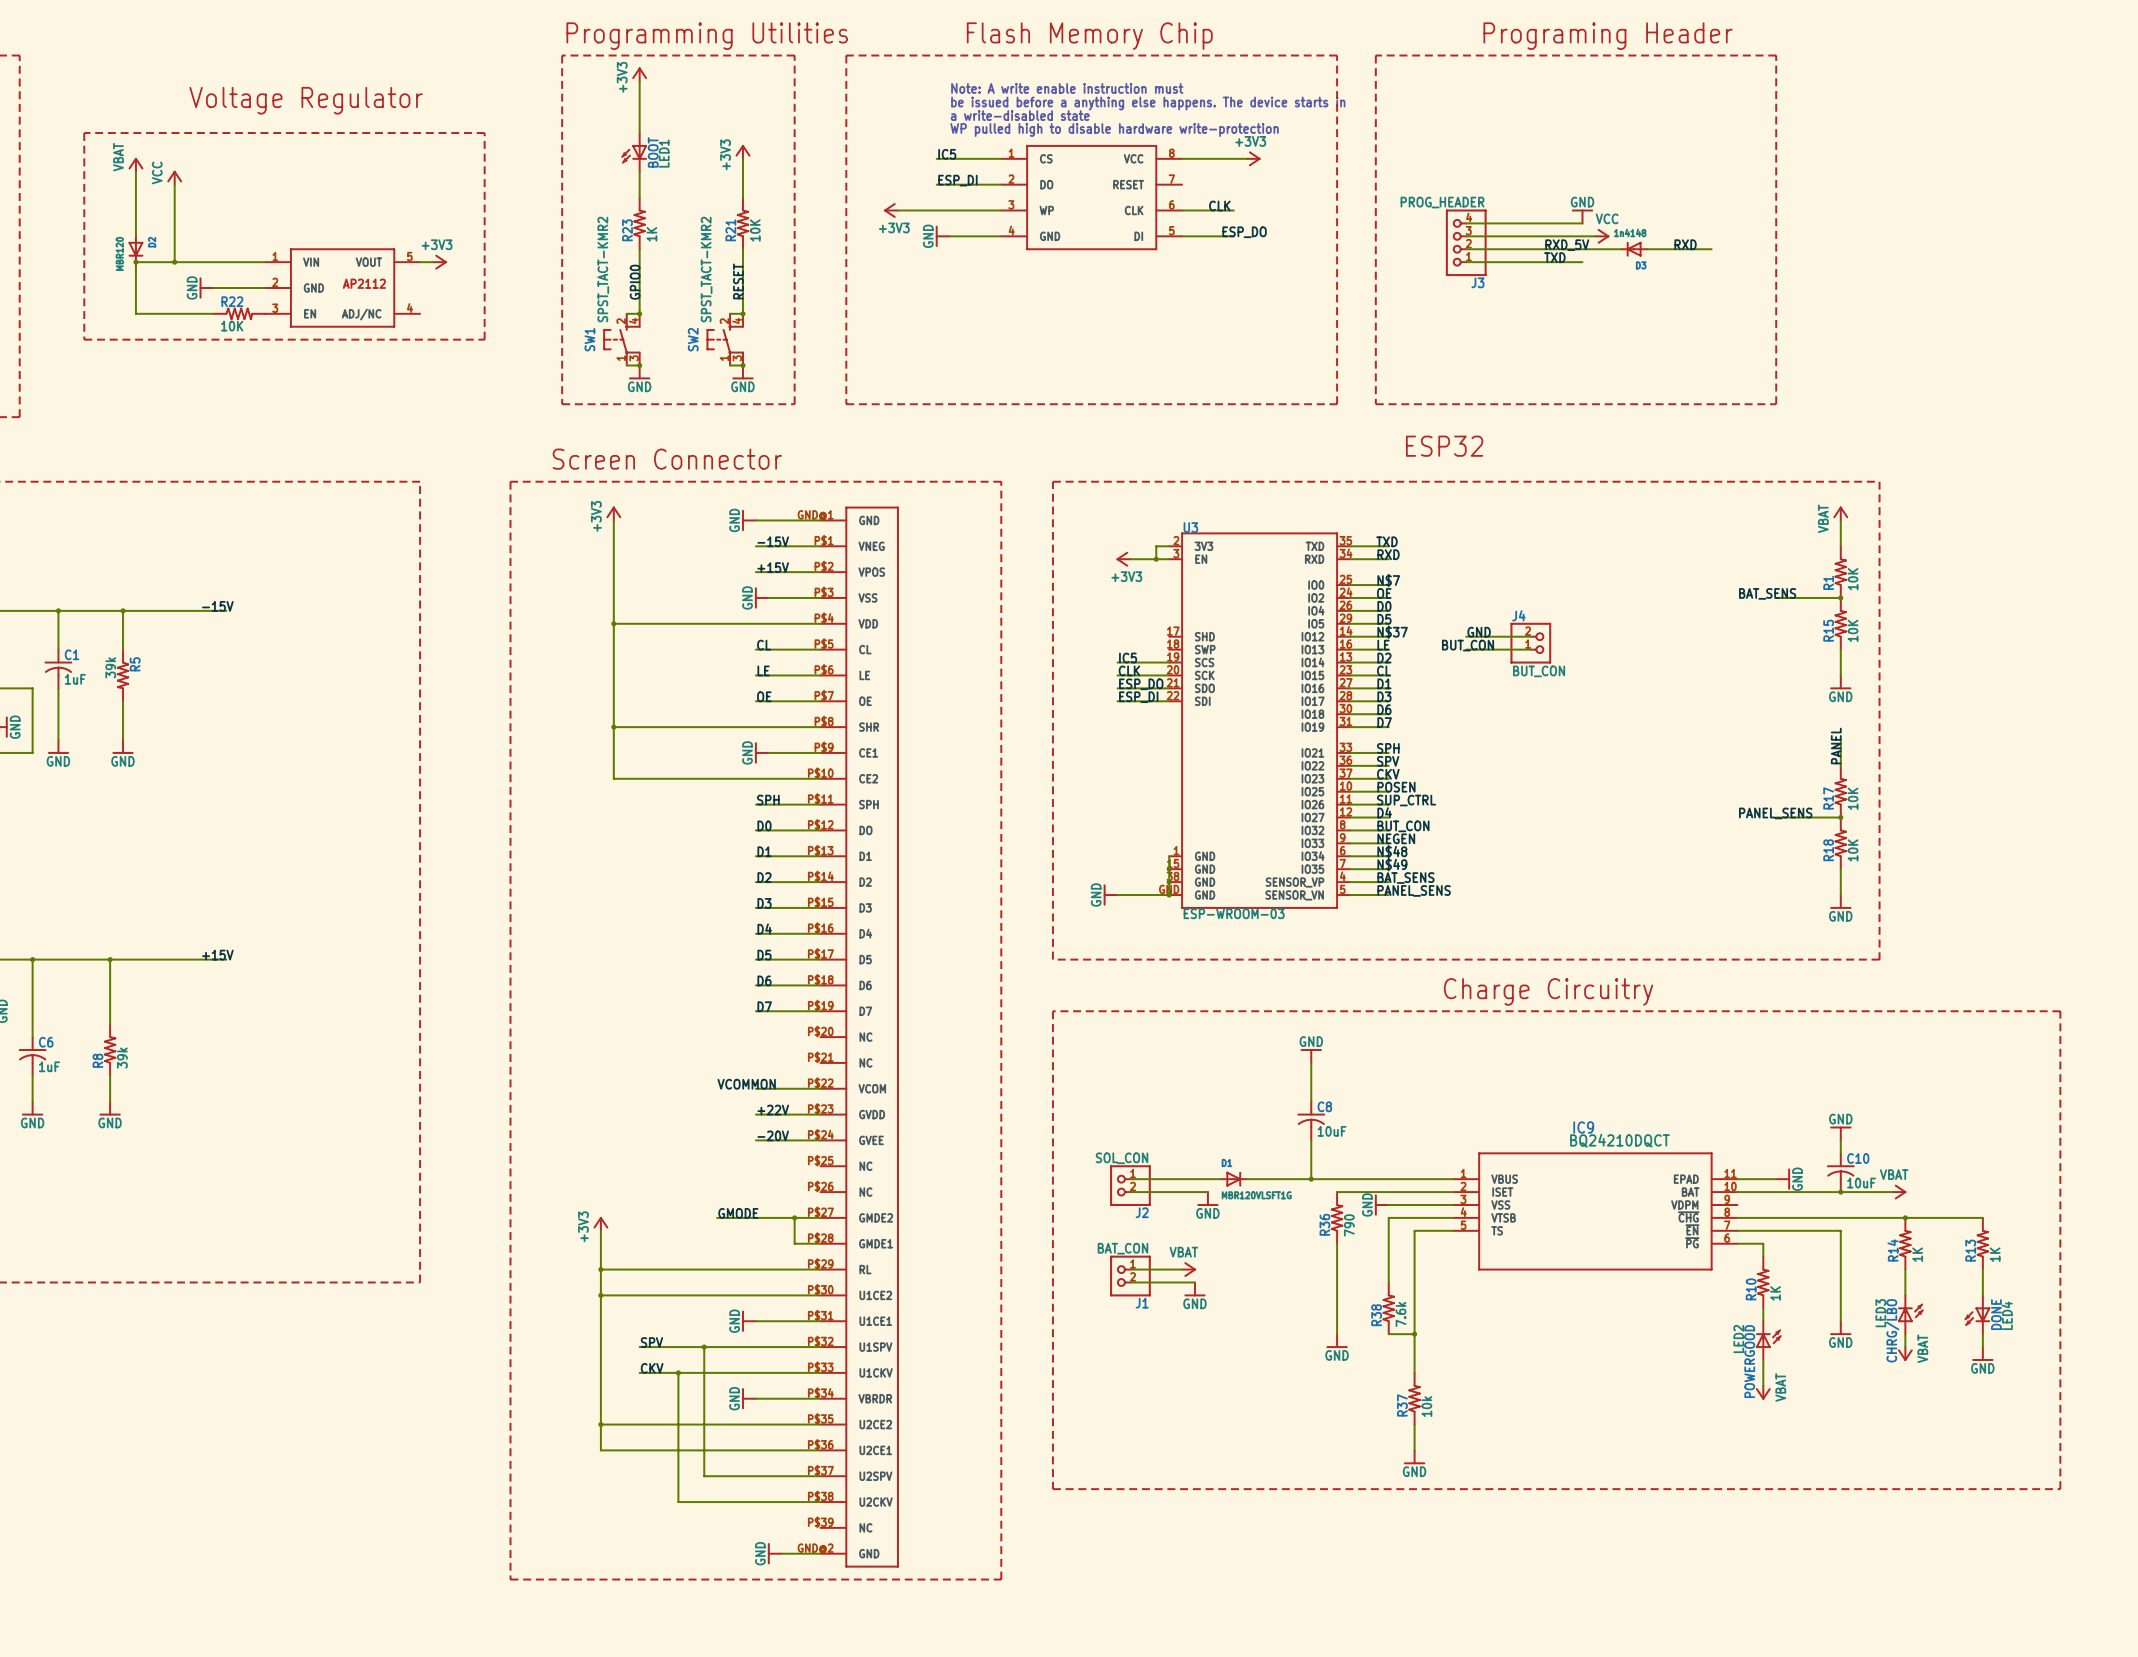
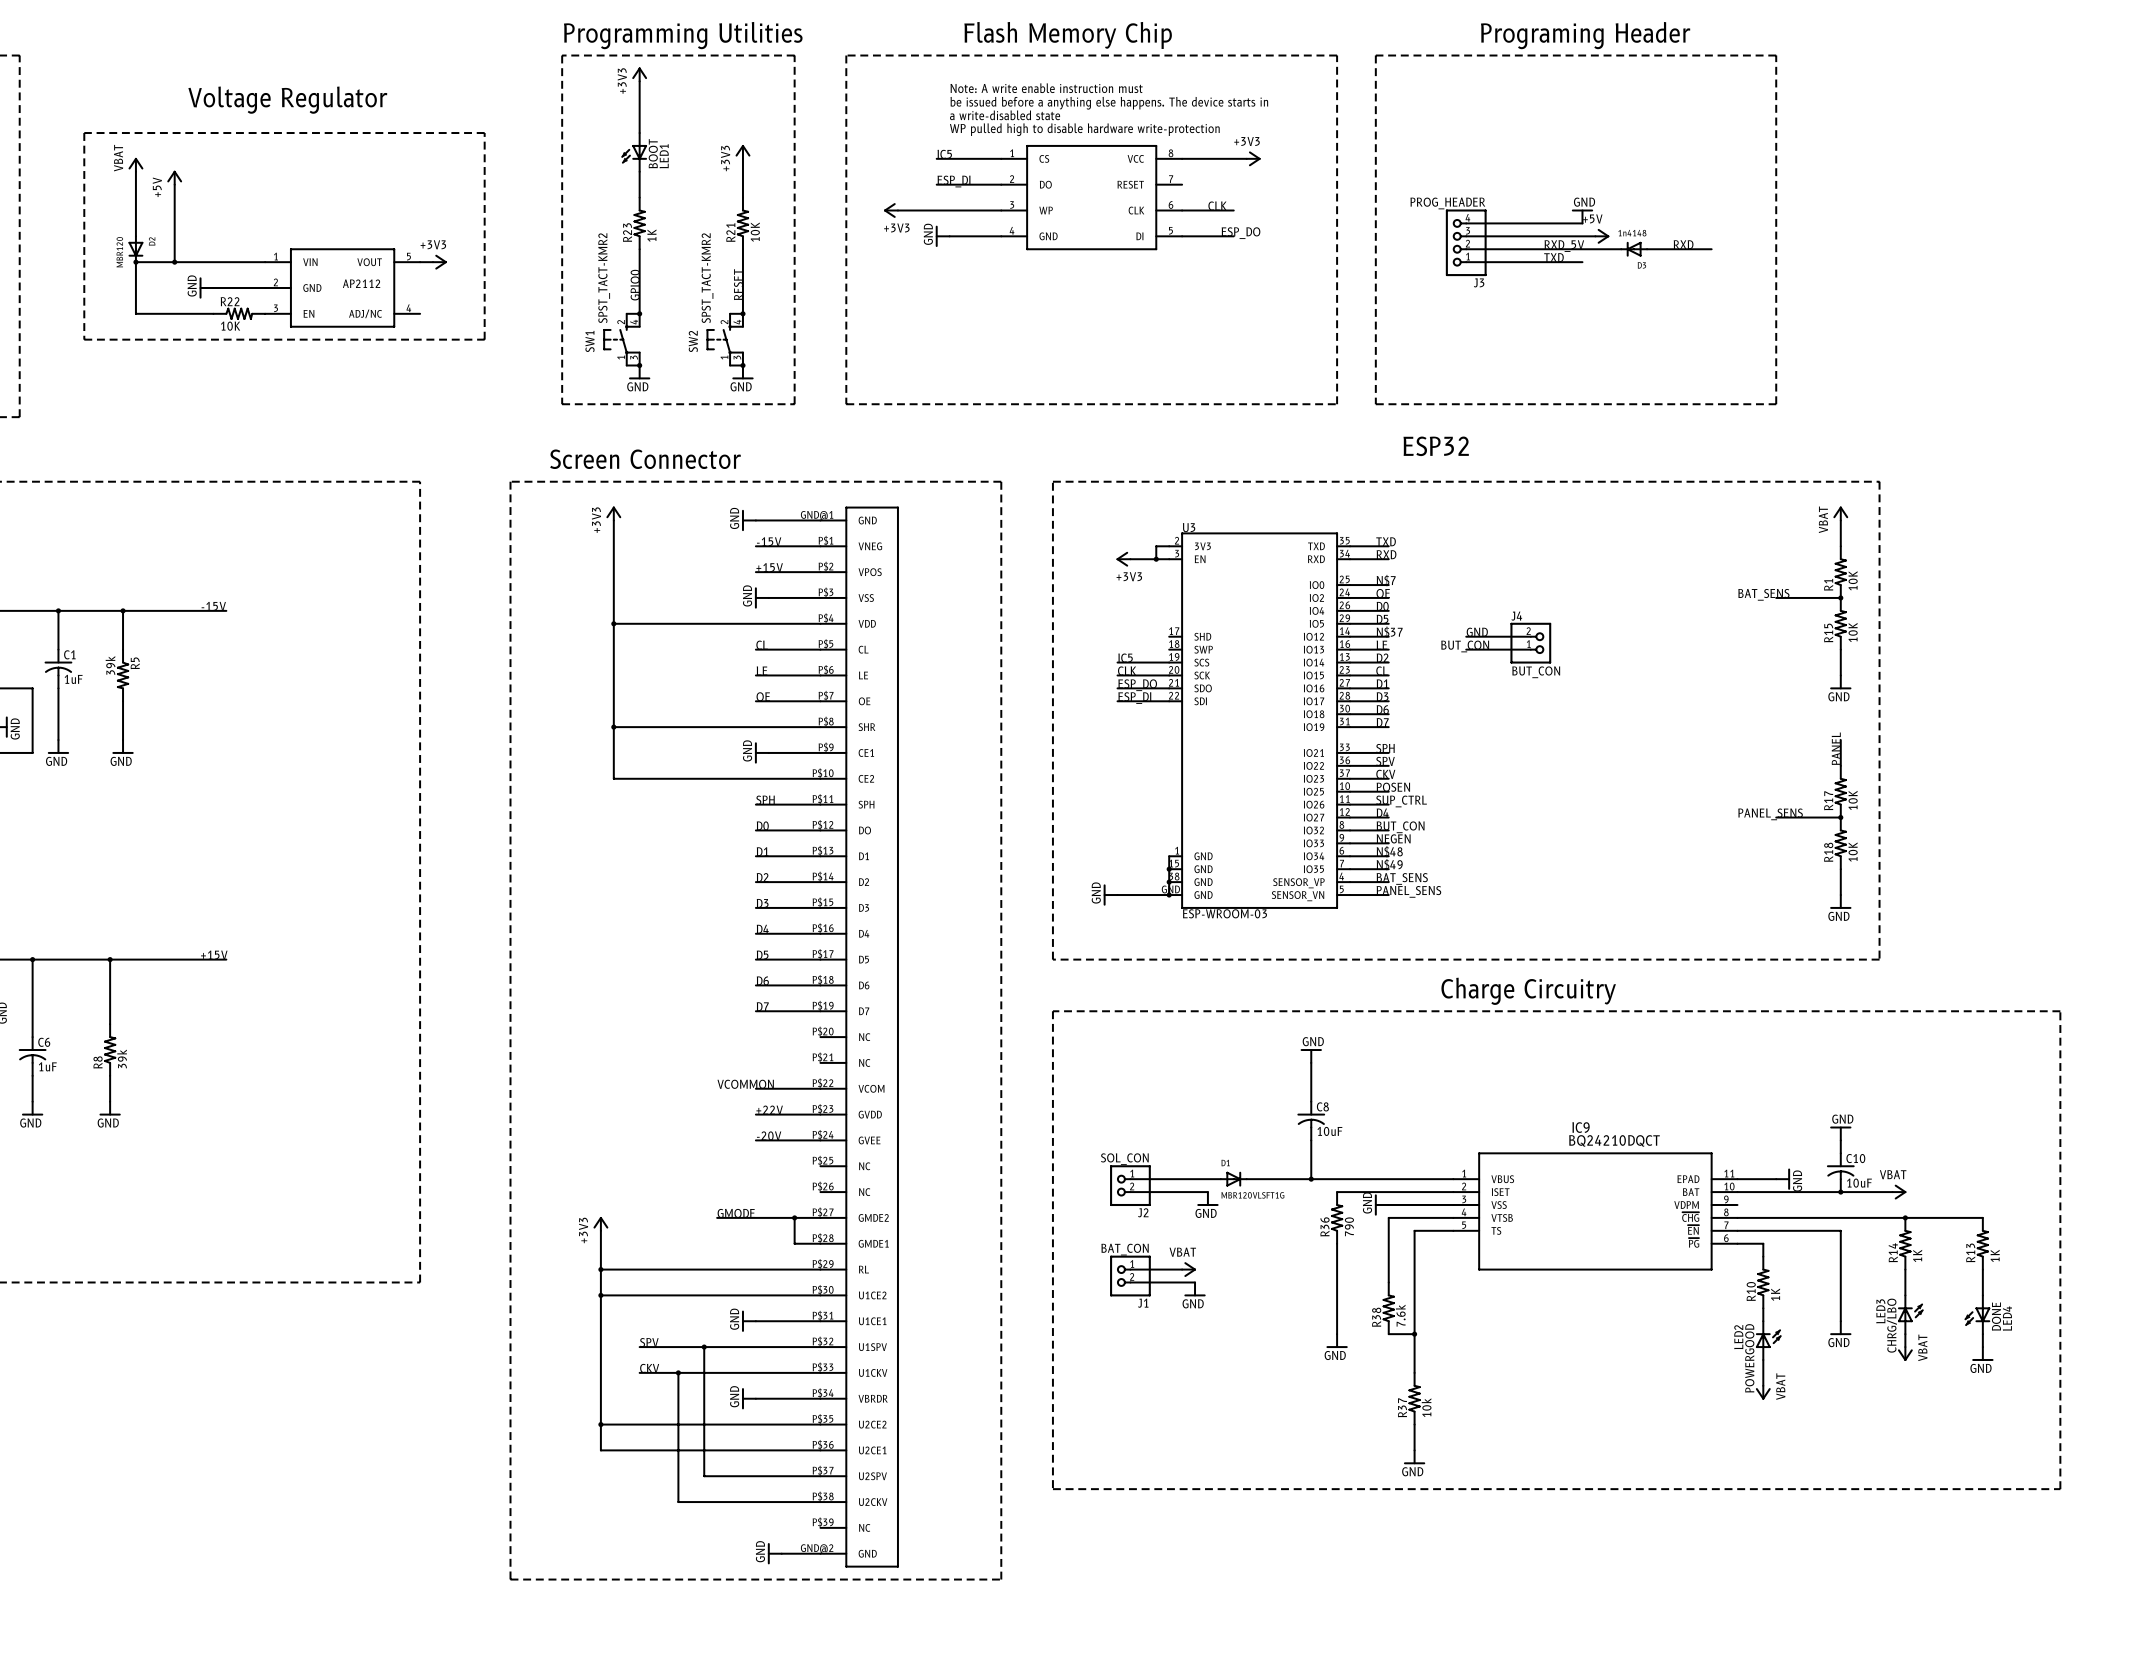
power symbol: VCC (174, 177) -> +5V (174, 177)
power symbol: VCC (1602, 236) -> +5V (1602, 236)

